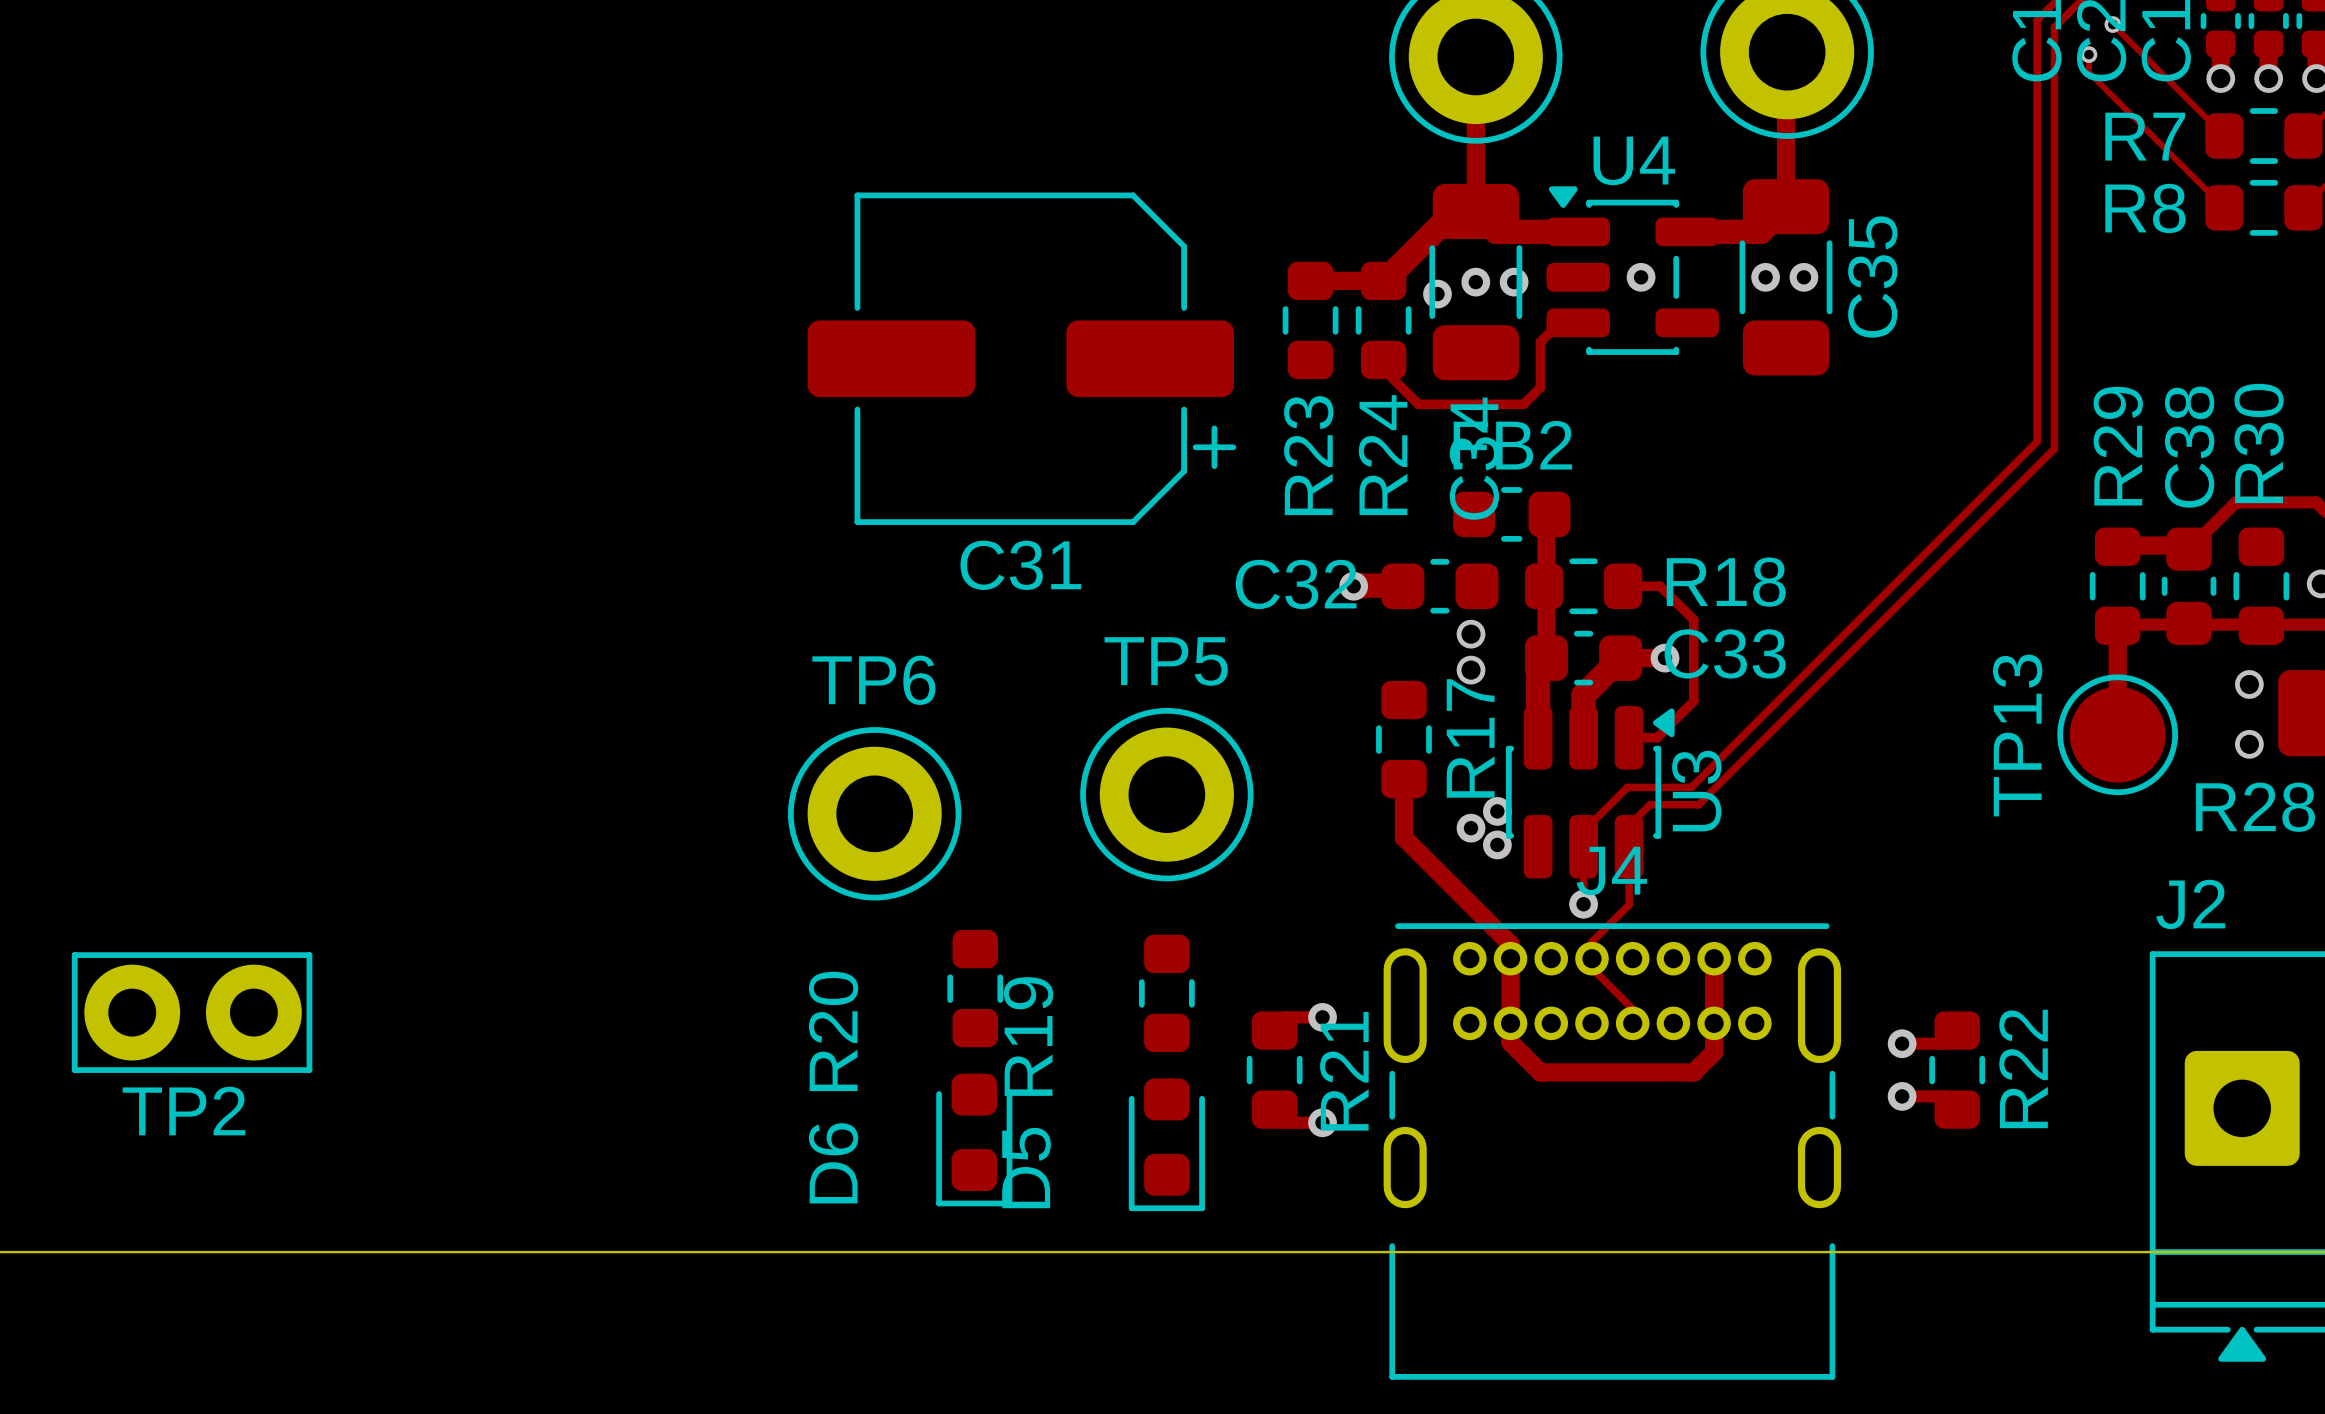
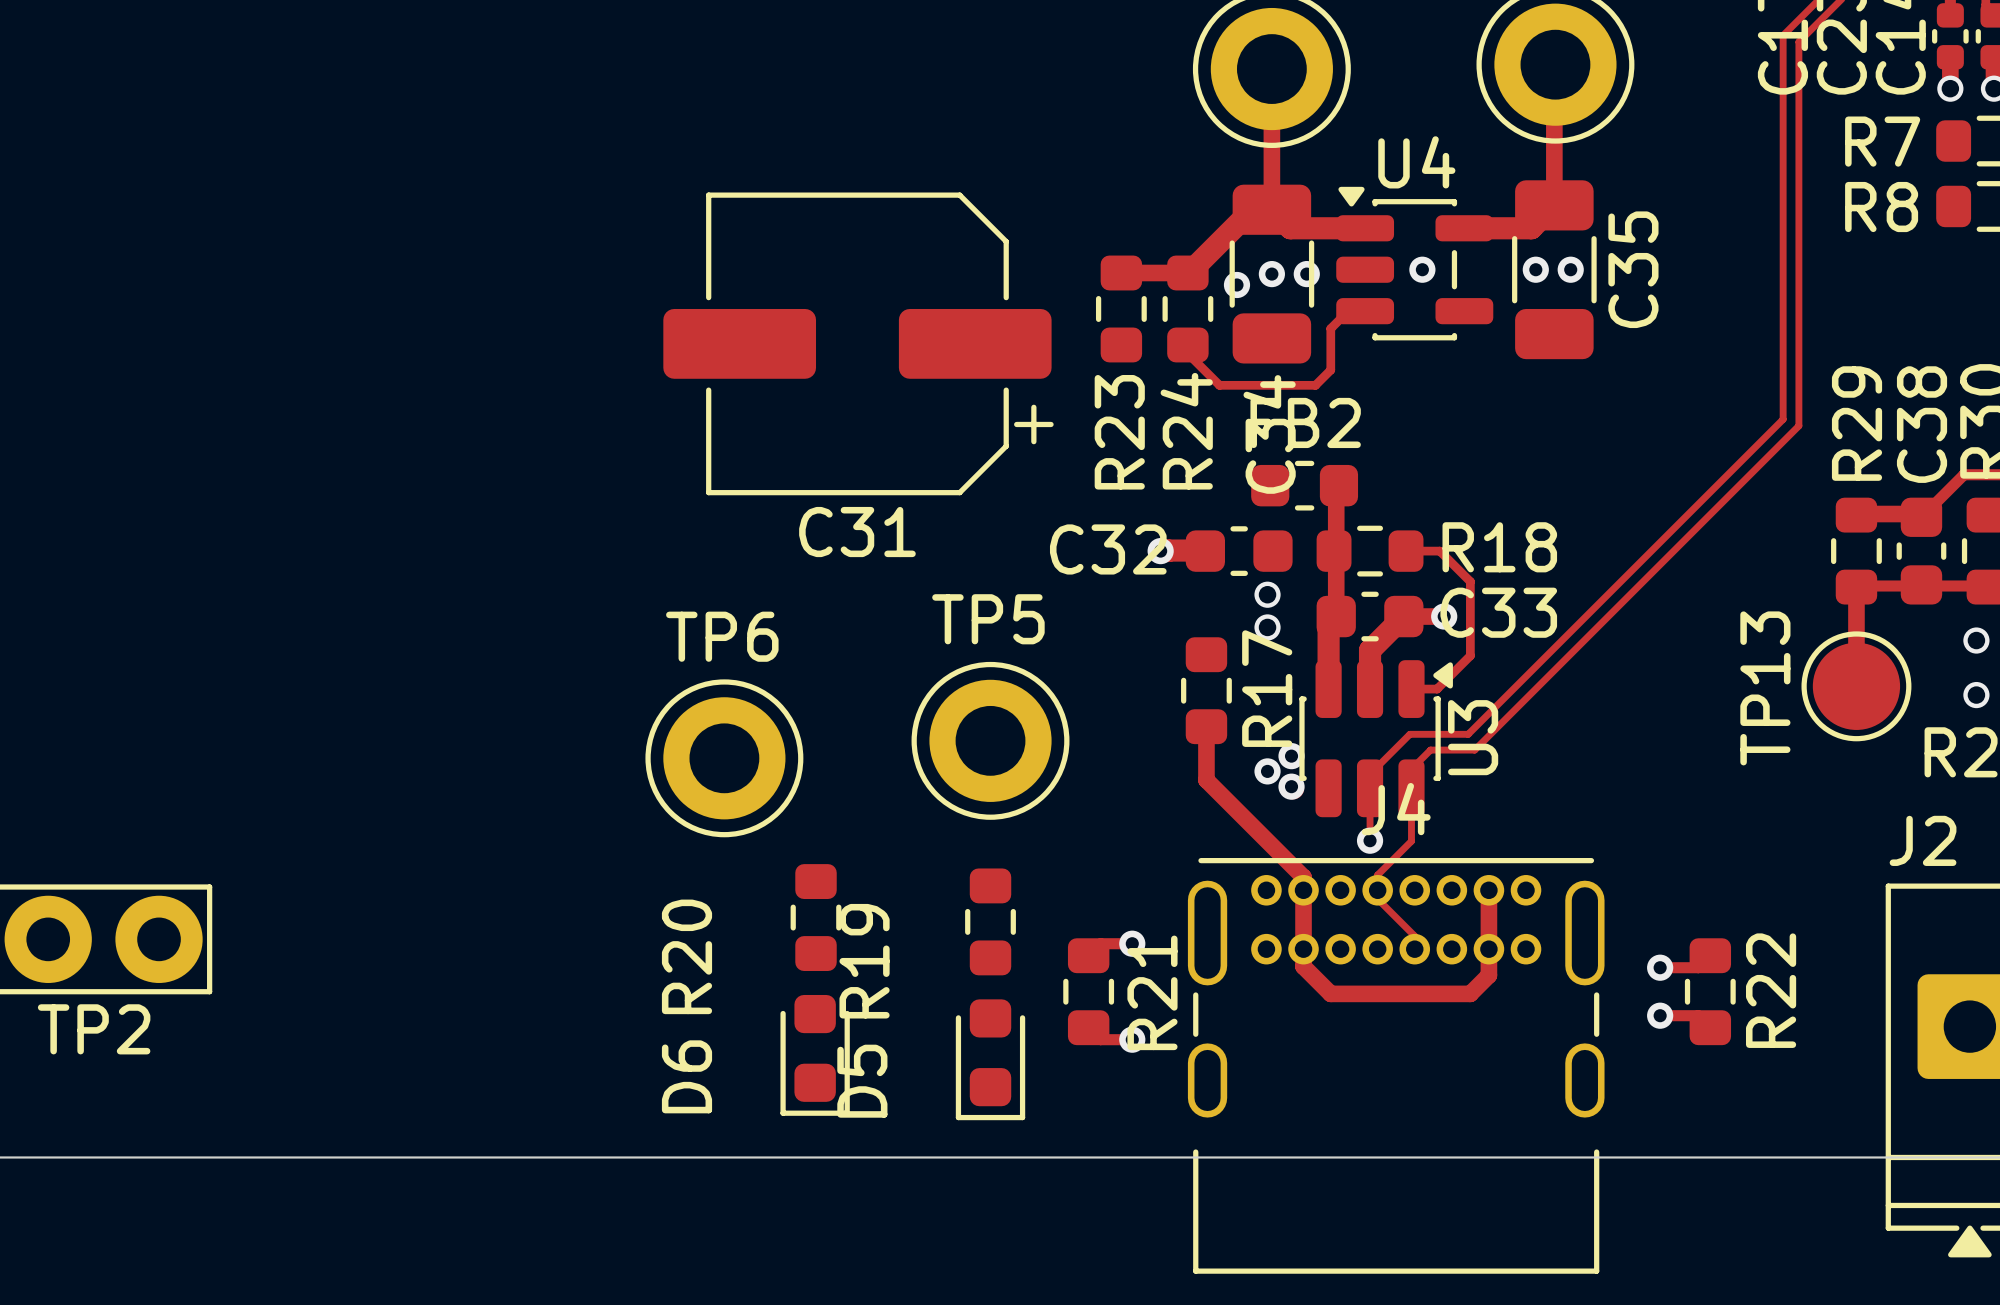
track: (2112, 24) (2224, 136) -> none
via: (2112, 24) -> none
track: (2088, 54) (2088, 72) (2224, 207) -> none
via: (2088, 54) -> none

